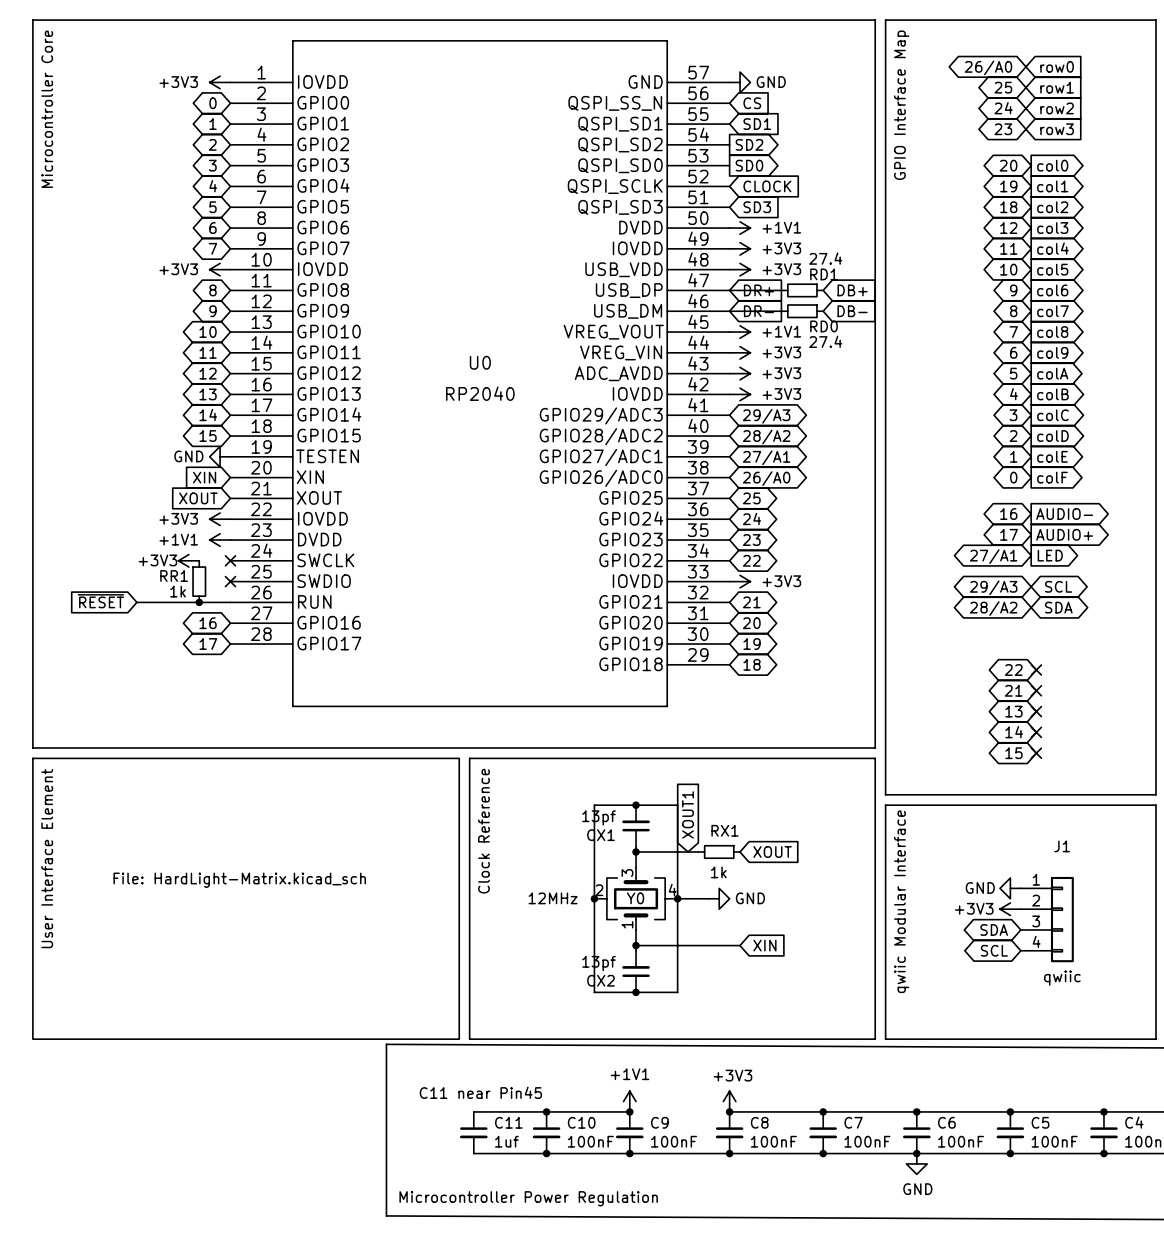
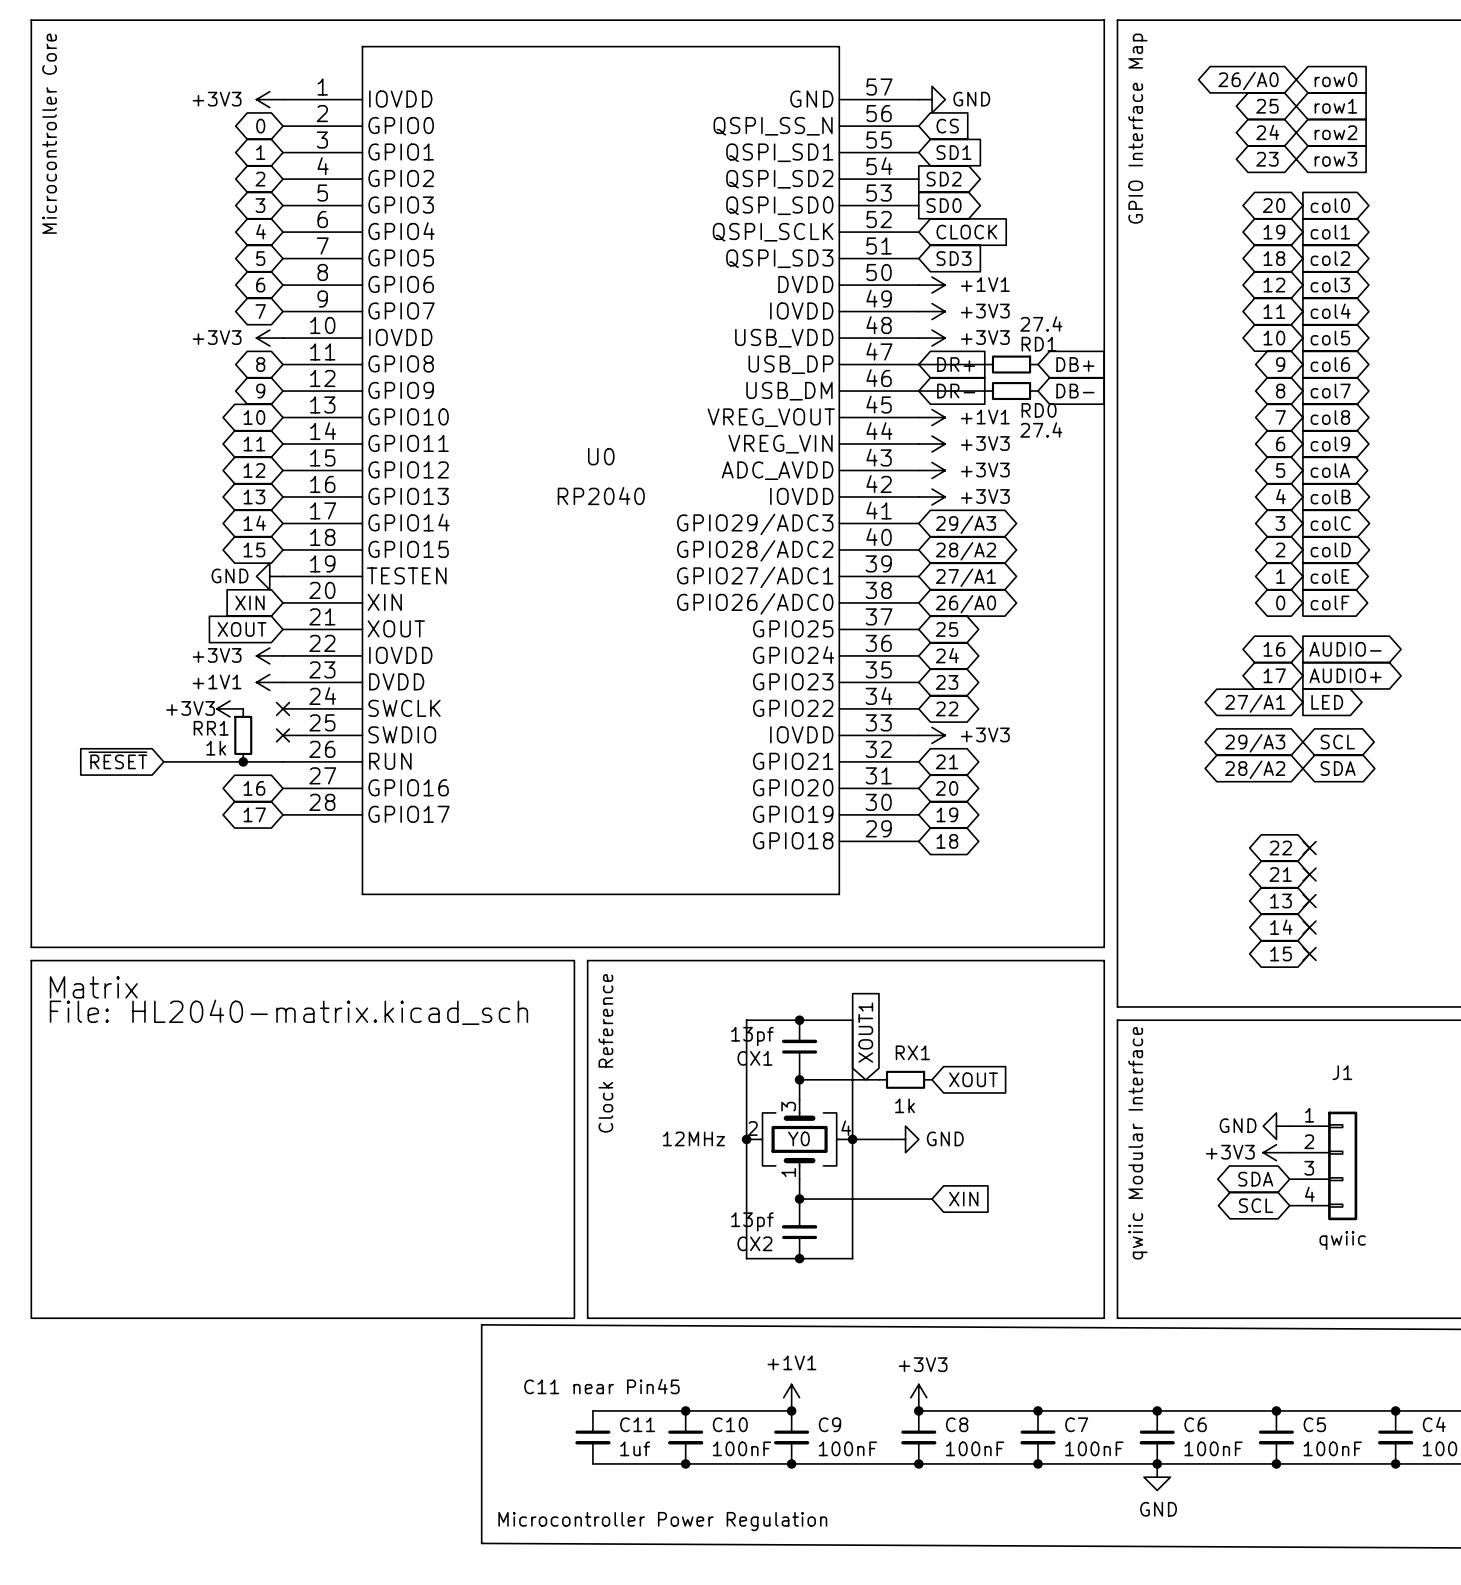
sheet User Interface Element name: User Interface Element (47, 858) -> Matrix (93, 987)
sheet User Interface Element value: File: HardLight-Matrix.kicad_sch (239, 880) -> File: HL2040-matrix.kicad_sch (288, 1012)

